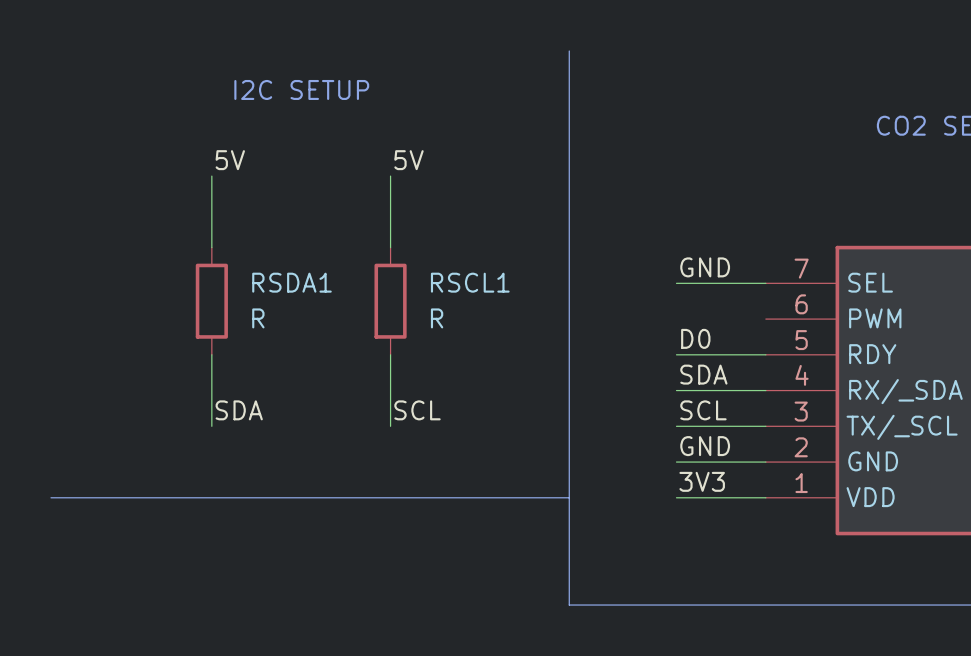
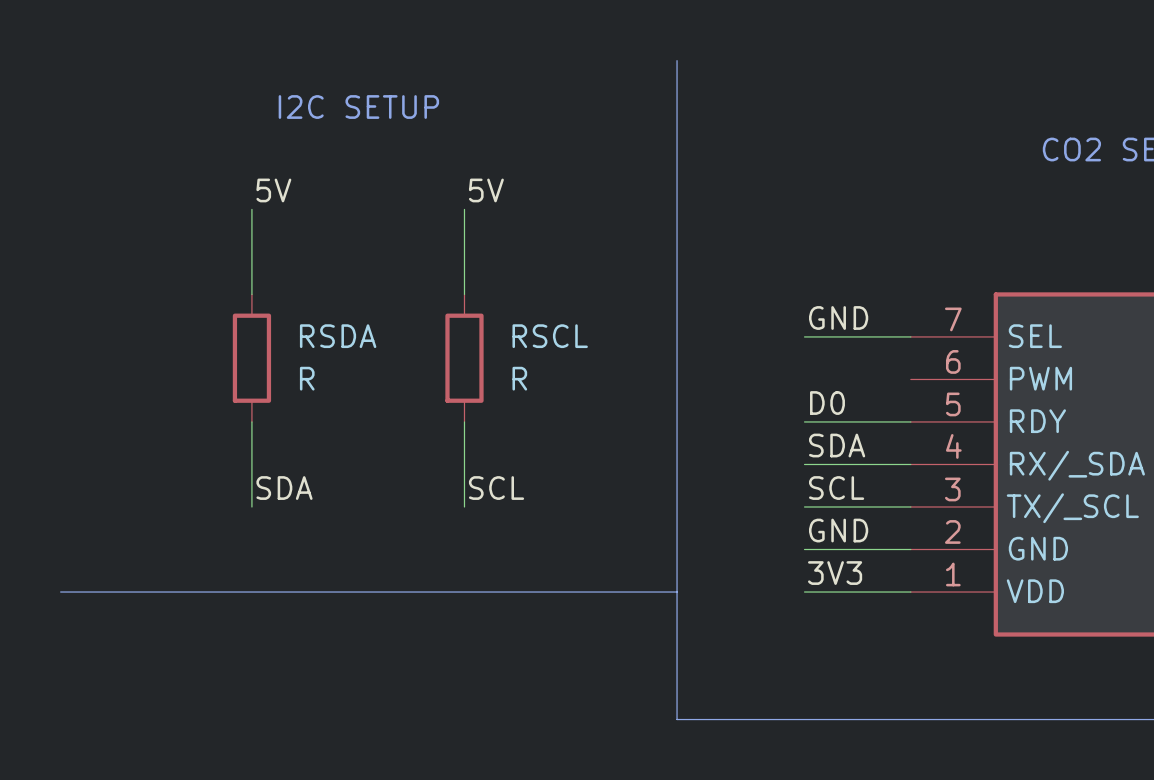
RSDA1 name: RSDA1 (291, 282) -> RSDA (338, 336)
RSCL1 name: RSCL1 (470, 282) -> RSCL (550, 336)

